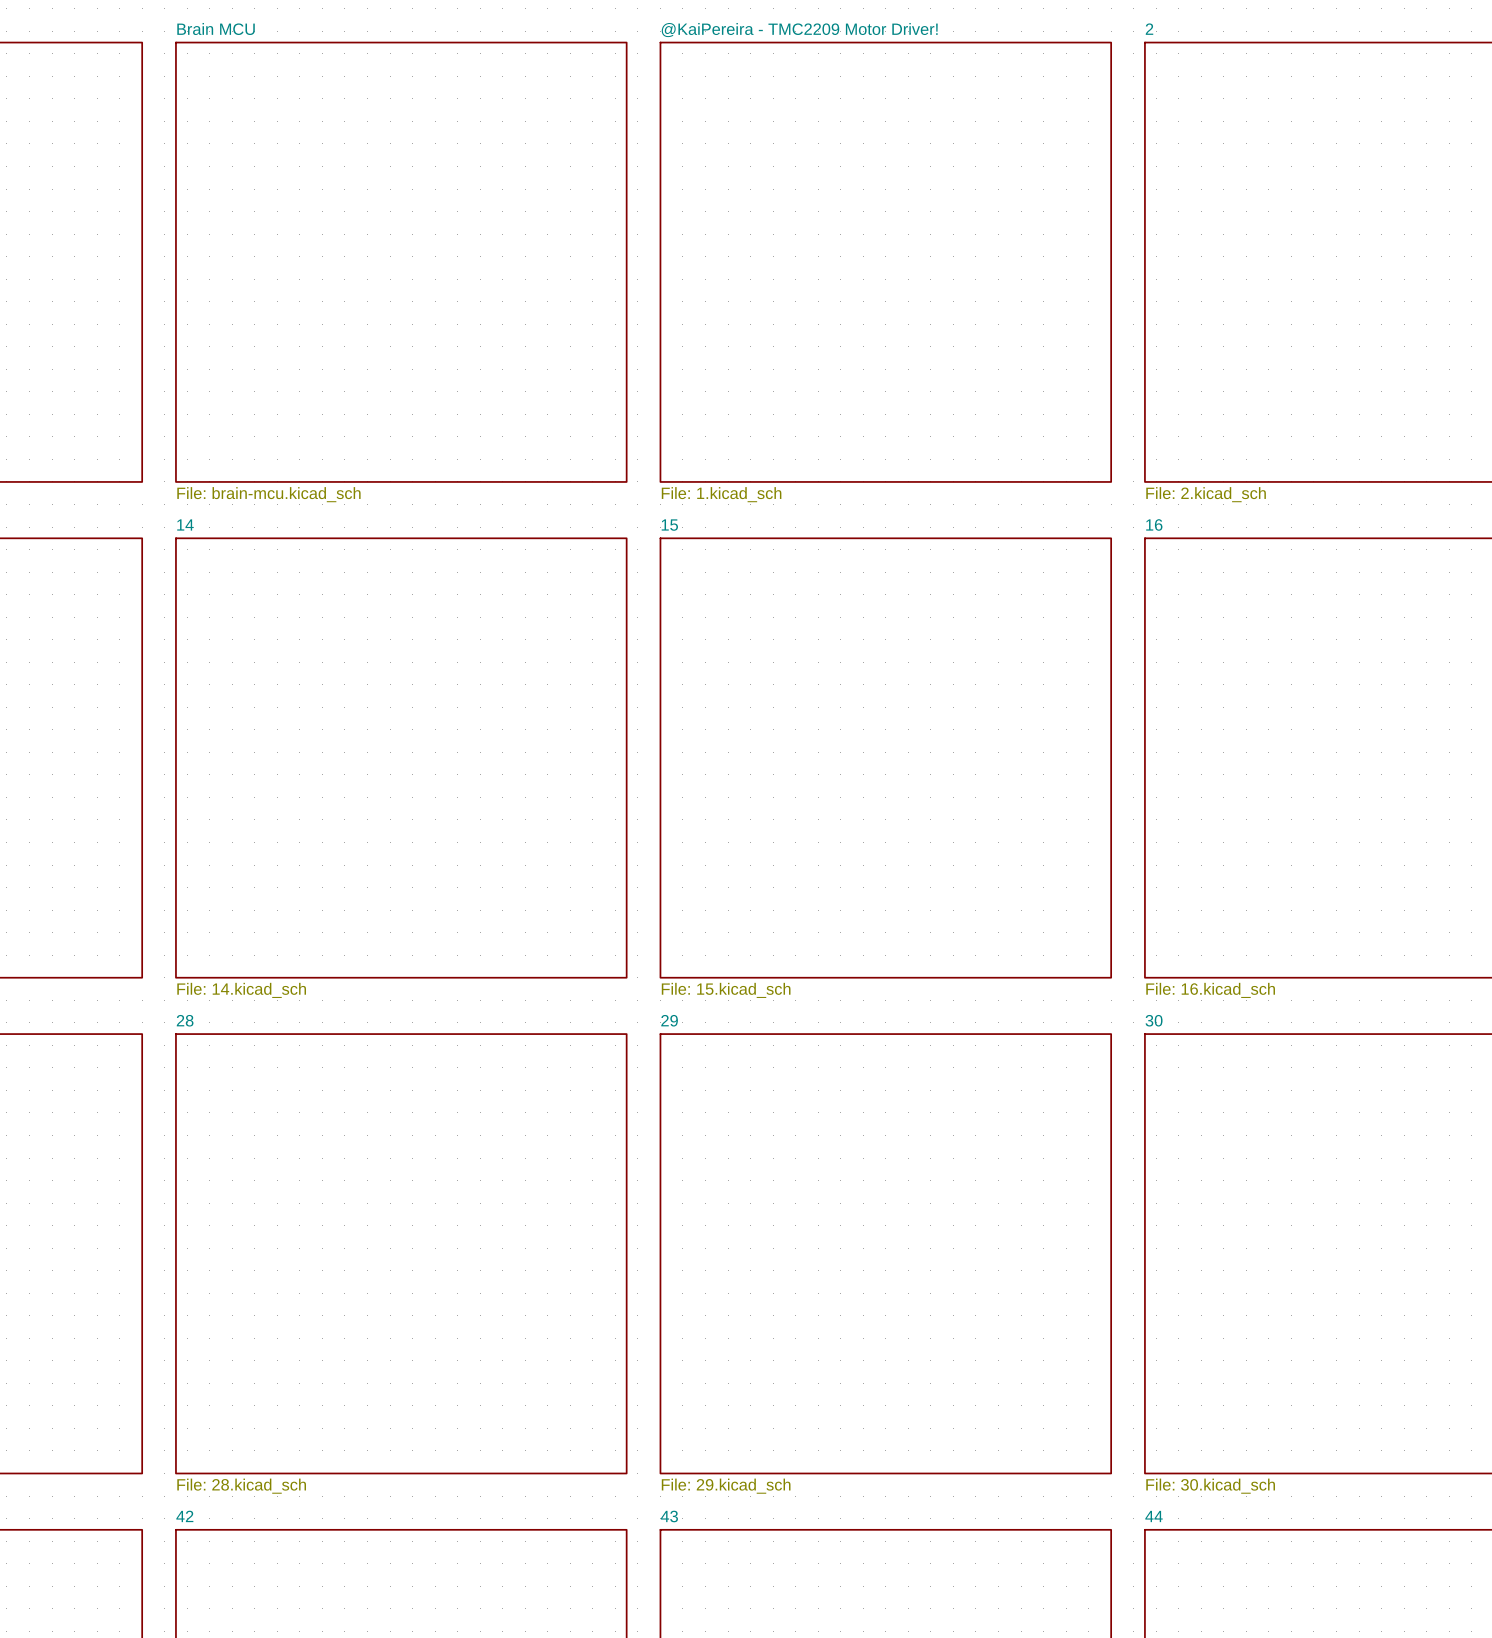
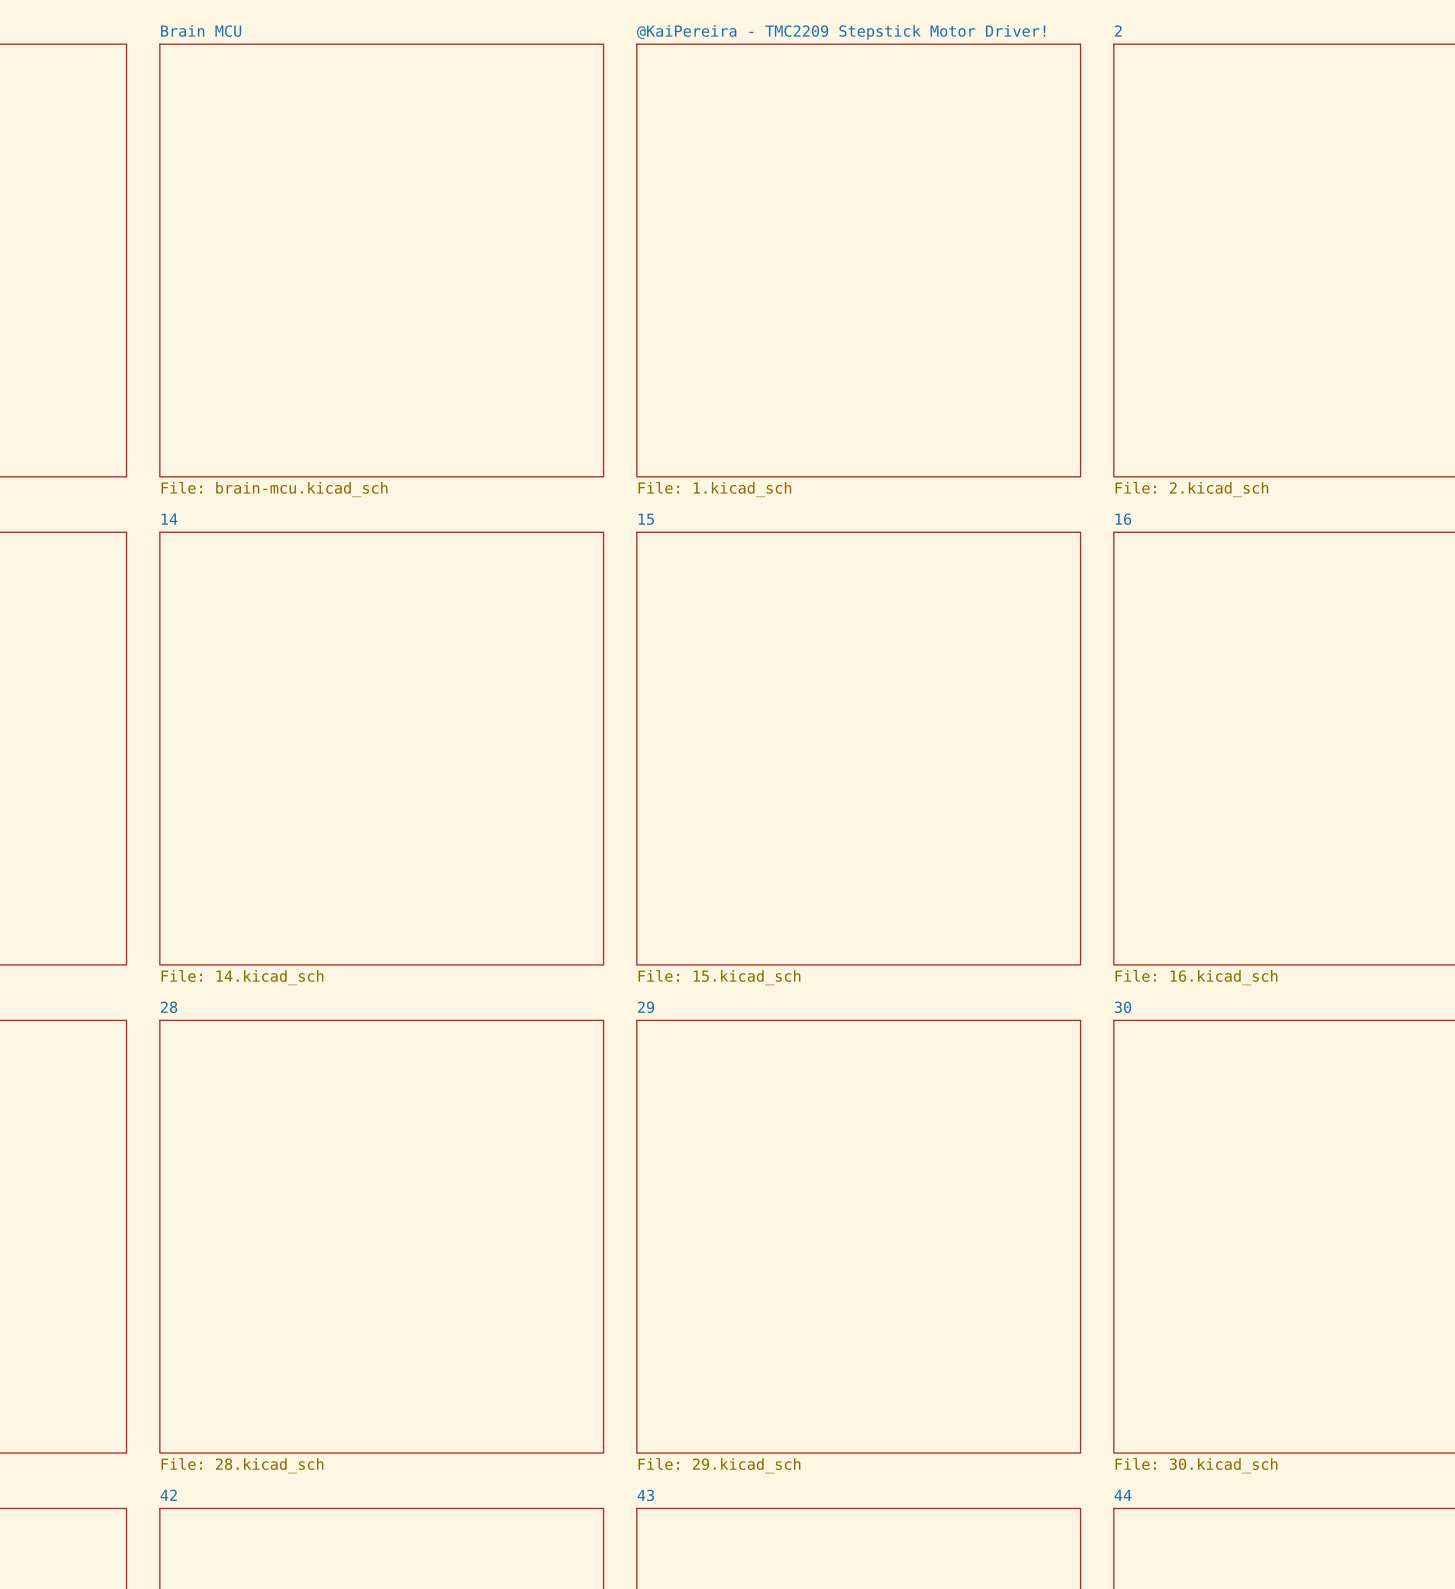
sheet @KaiPereira - TMC2209 Motor Driver! name: @KaiPereira - TMC2209 Motor Driver! (799, 30) -> @KaiPereira - TMC2209 Stepstick Motor Driver! (841, 32)

